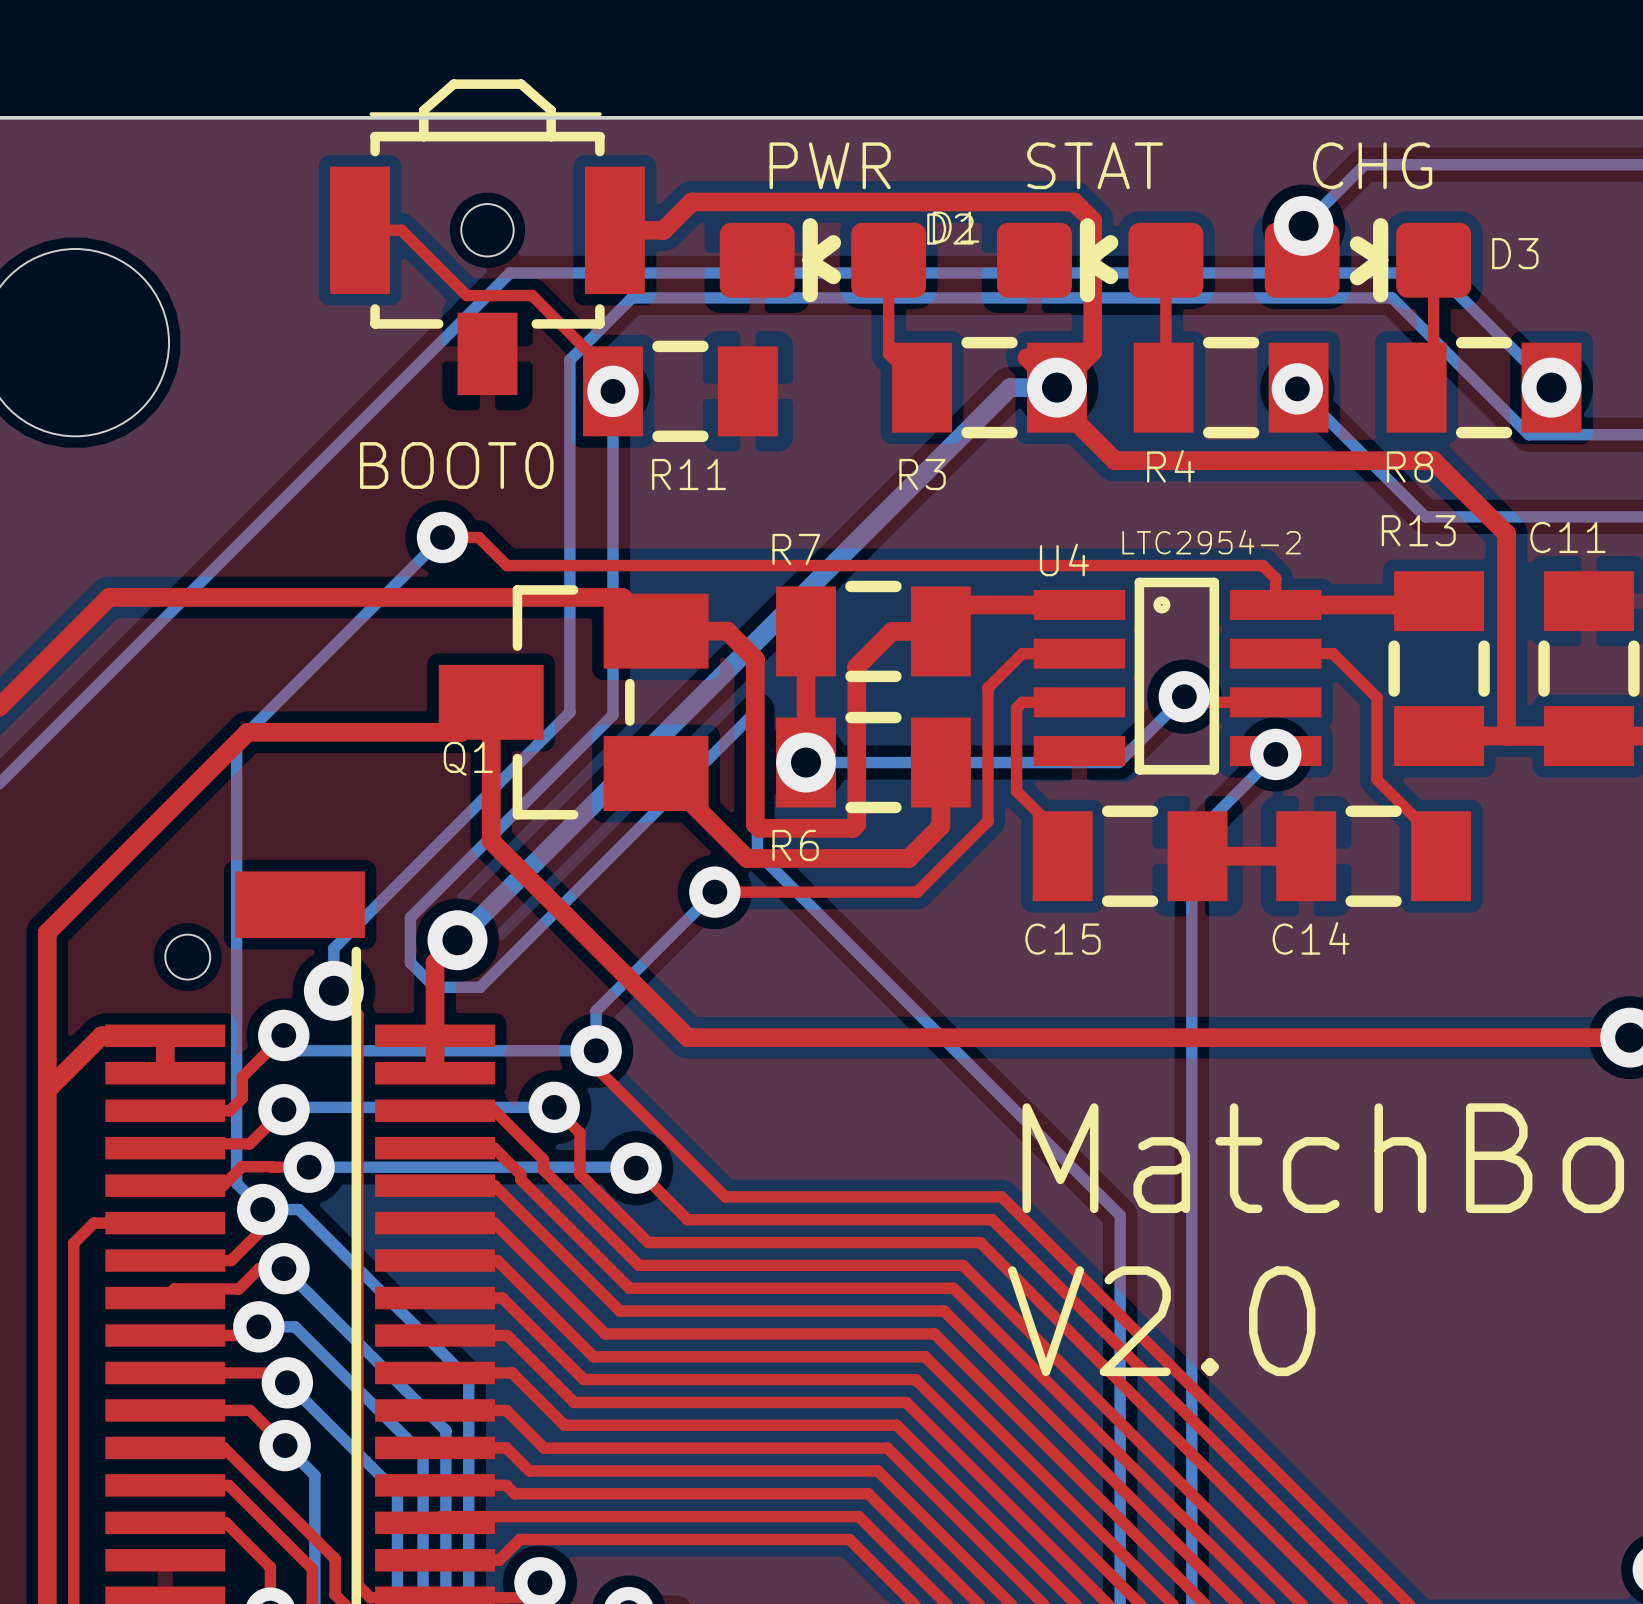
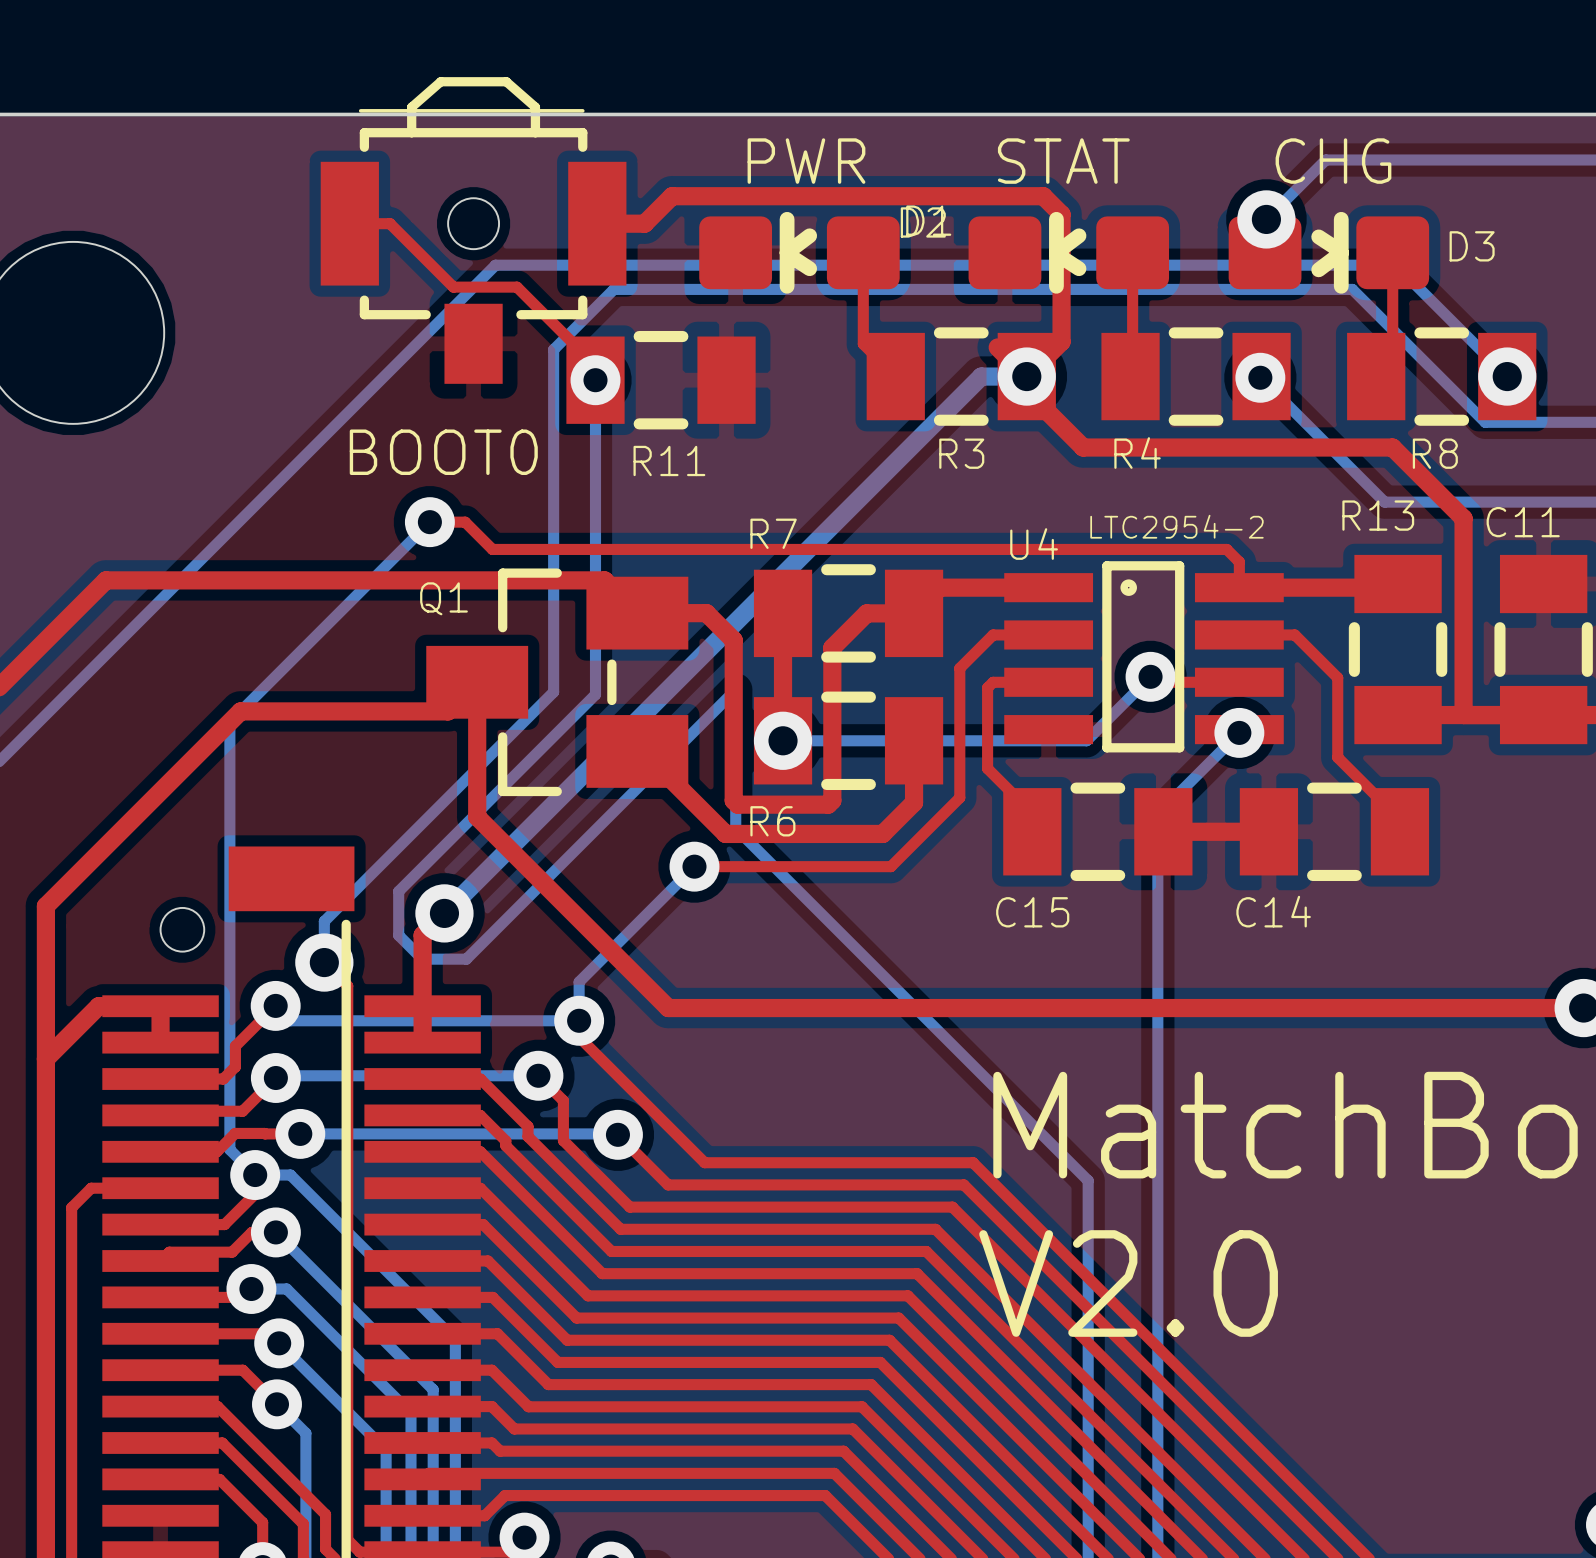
R8 name position: R8 (1410, 467) -> R8 (1435, 453)
R3 name position: R3 (922, 474) -> R3 (961, 453)
Q1 name position: Q1 (468, 758) -> Q1 (443, 598)

